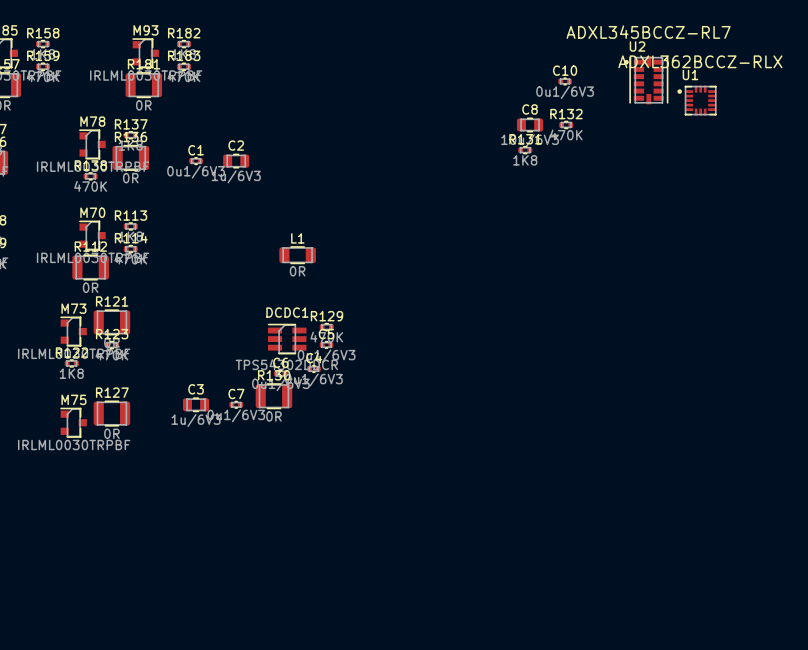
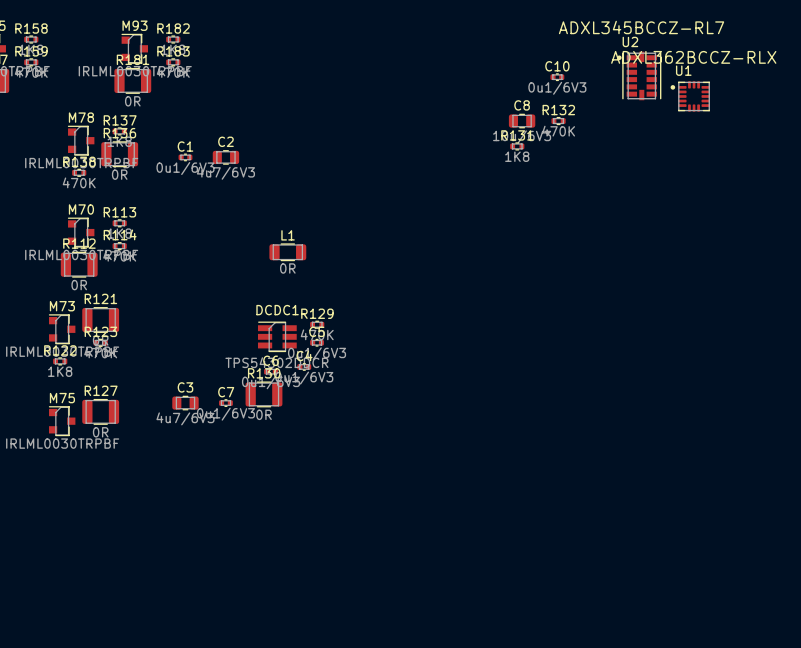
C2 value: 1u/6V3 (236, 176) -> 4u7/6V3 (225, 173)
C3 value: 1u/6V3 (196, 420) -> 4u7/6V3 (185, 418)

